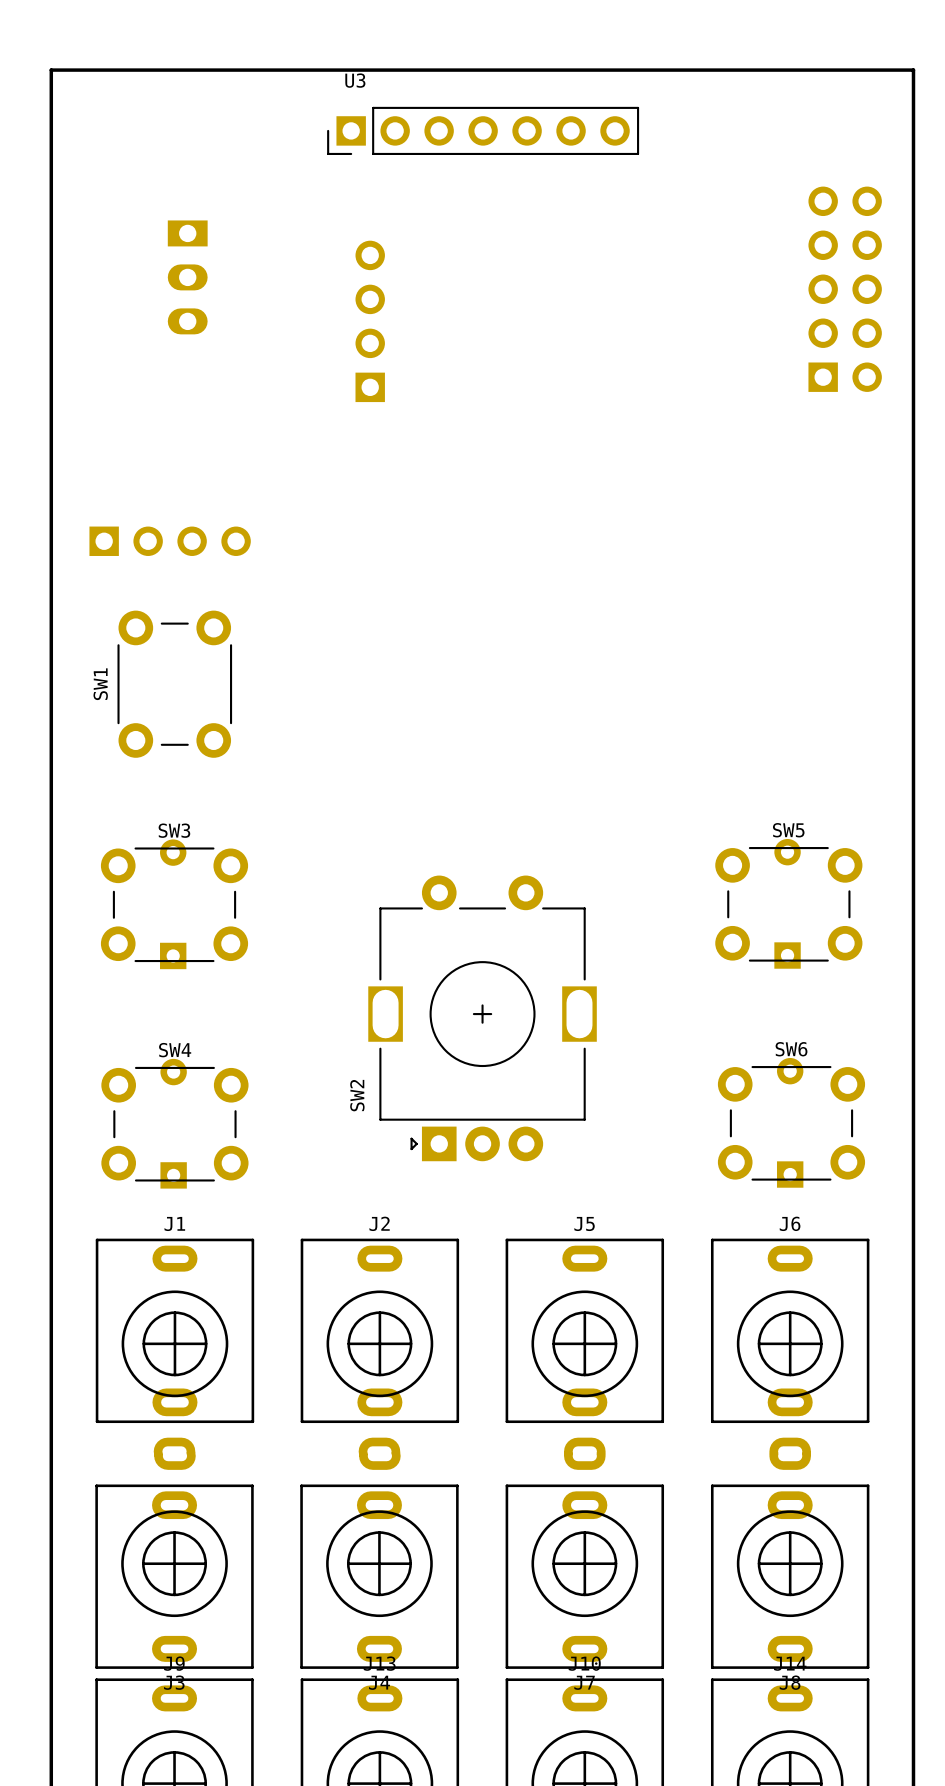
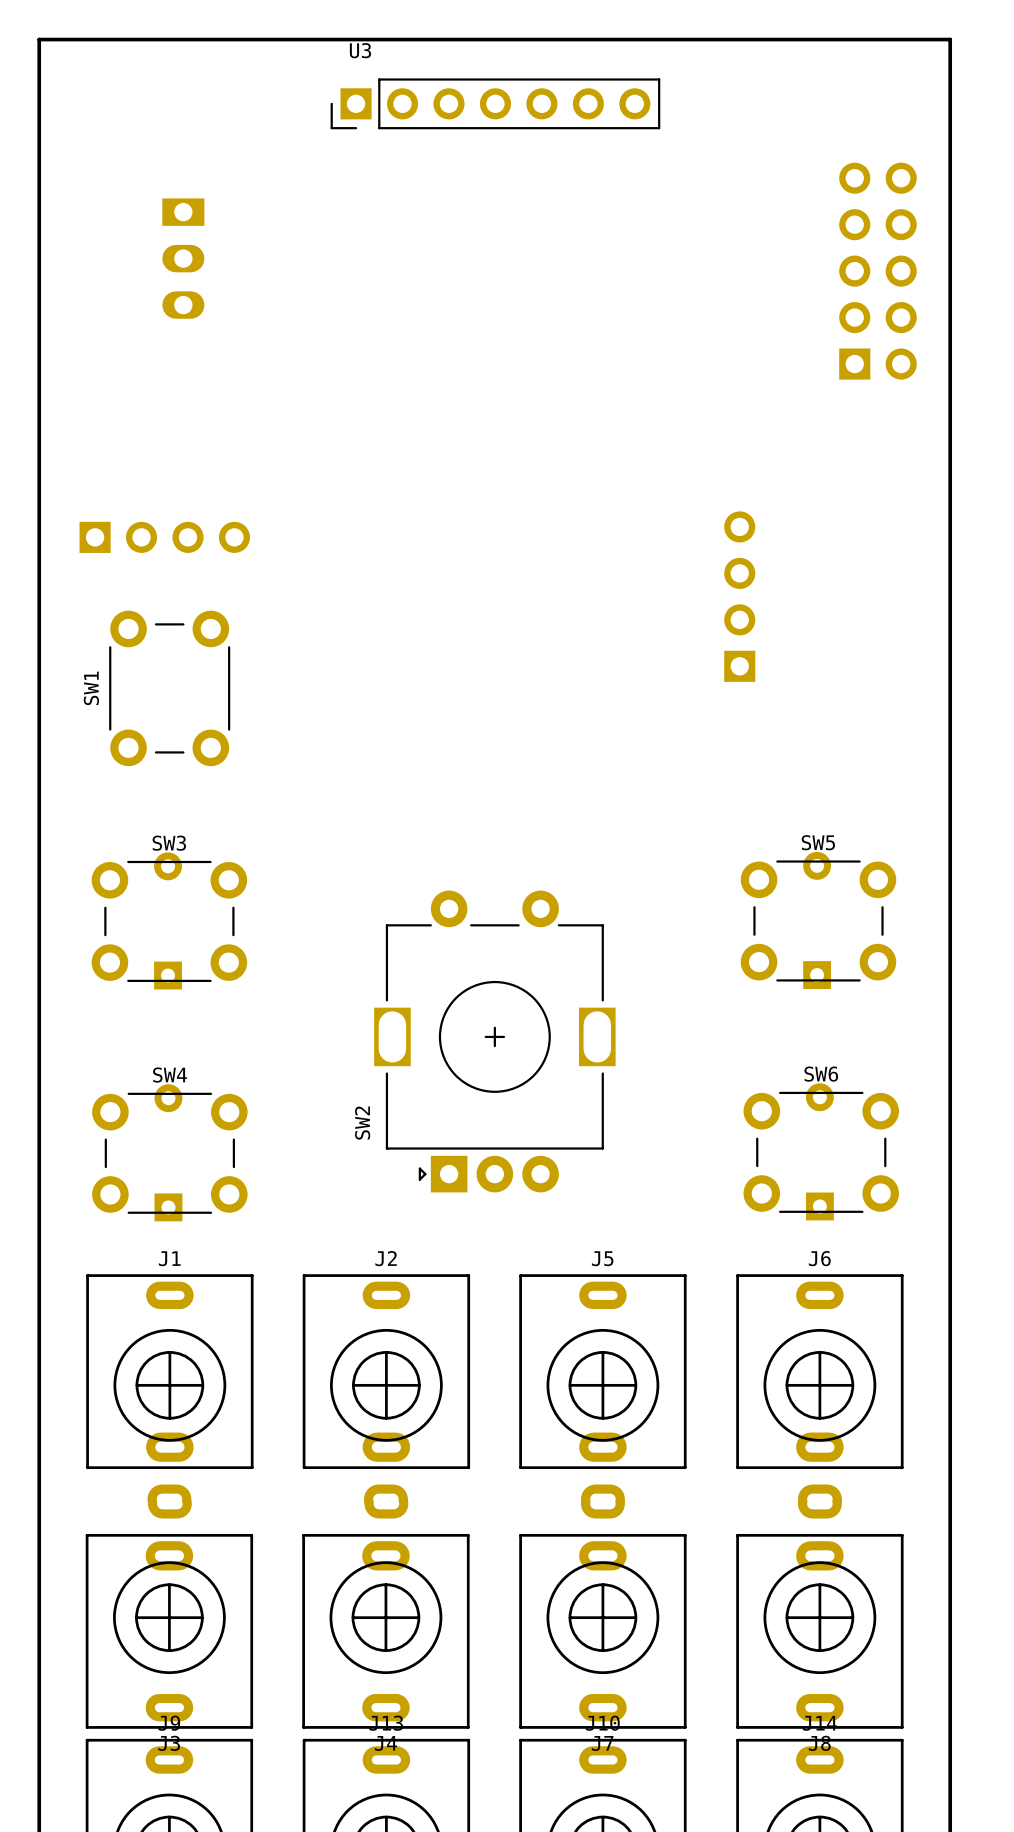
part: (370, 321) -> none
part: none -> (739, 596)

